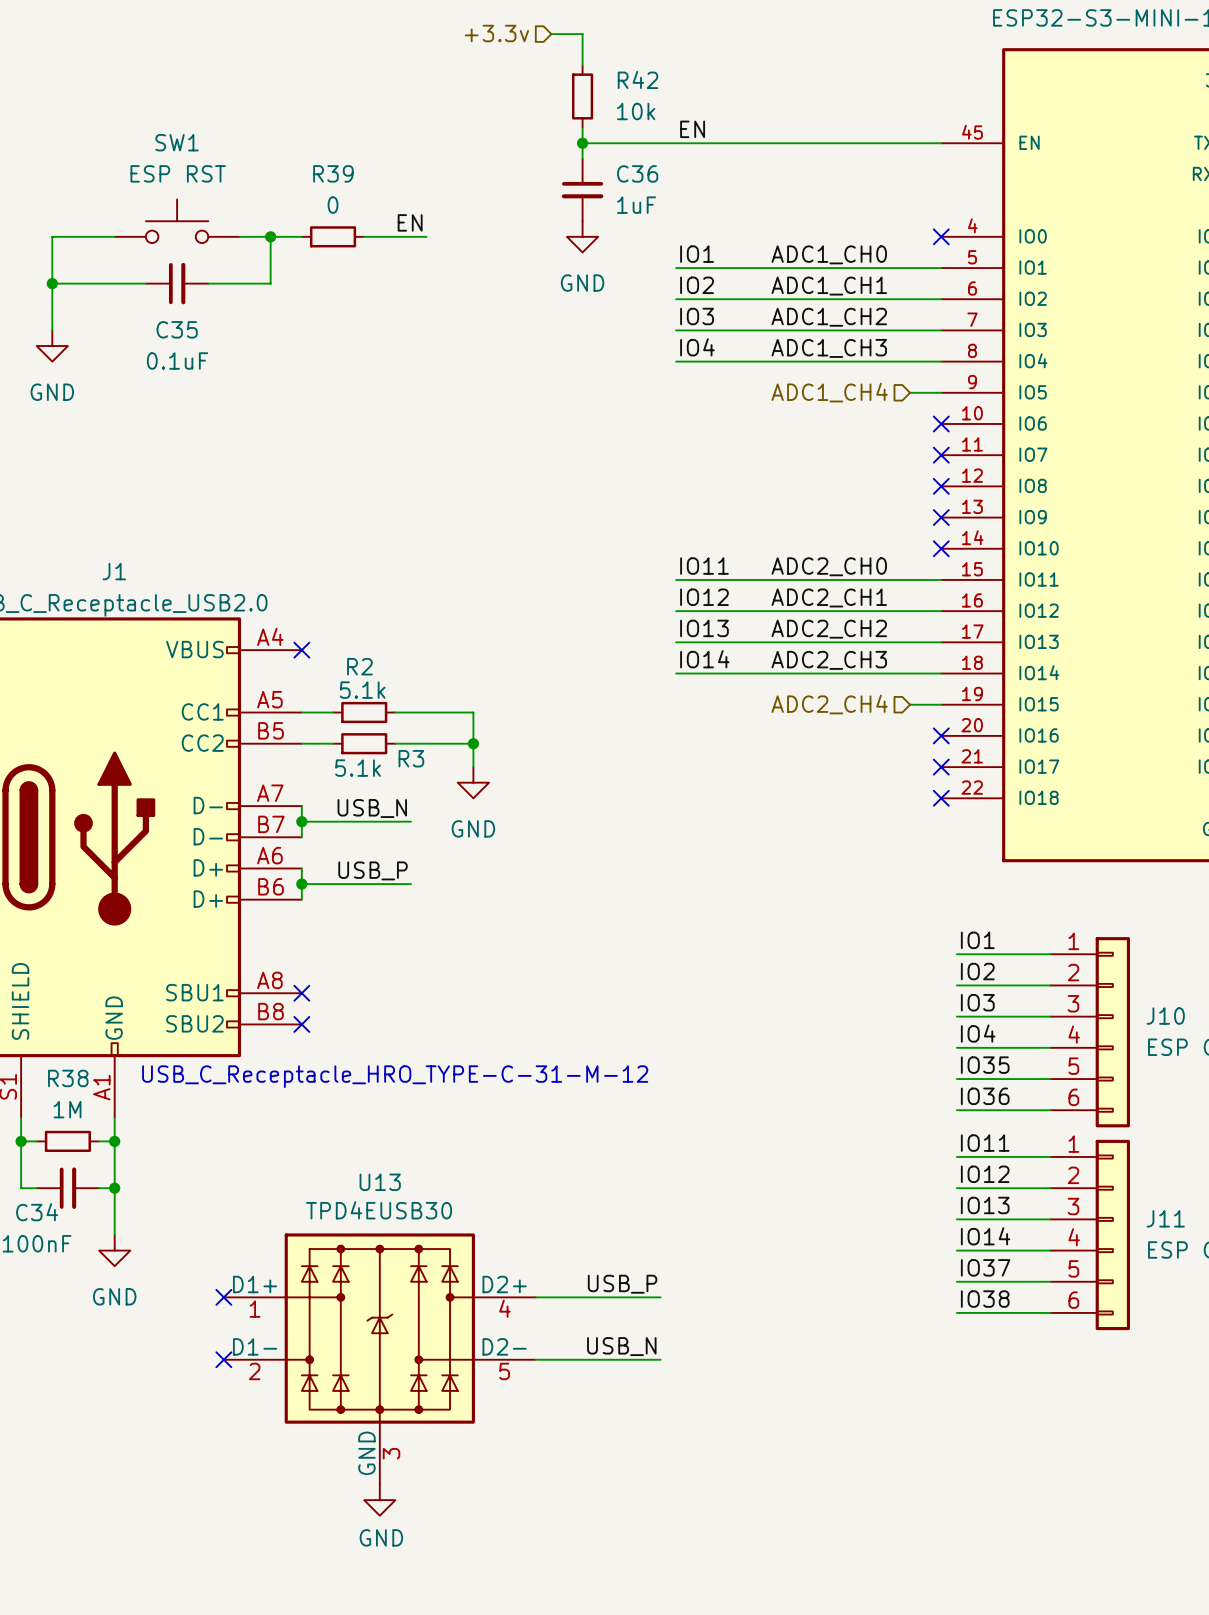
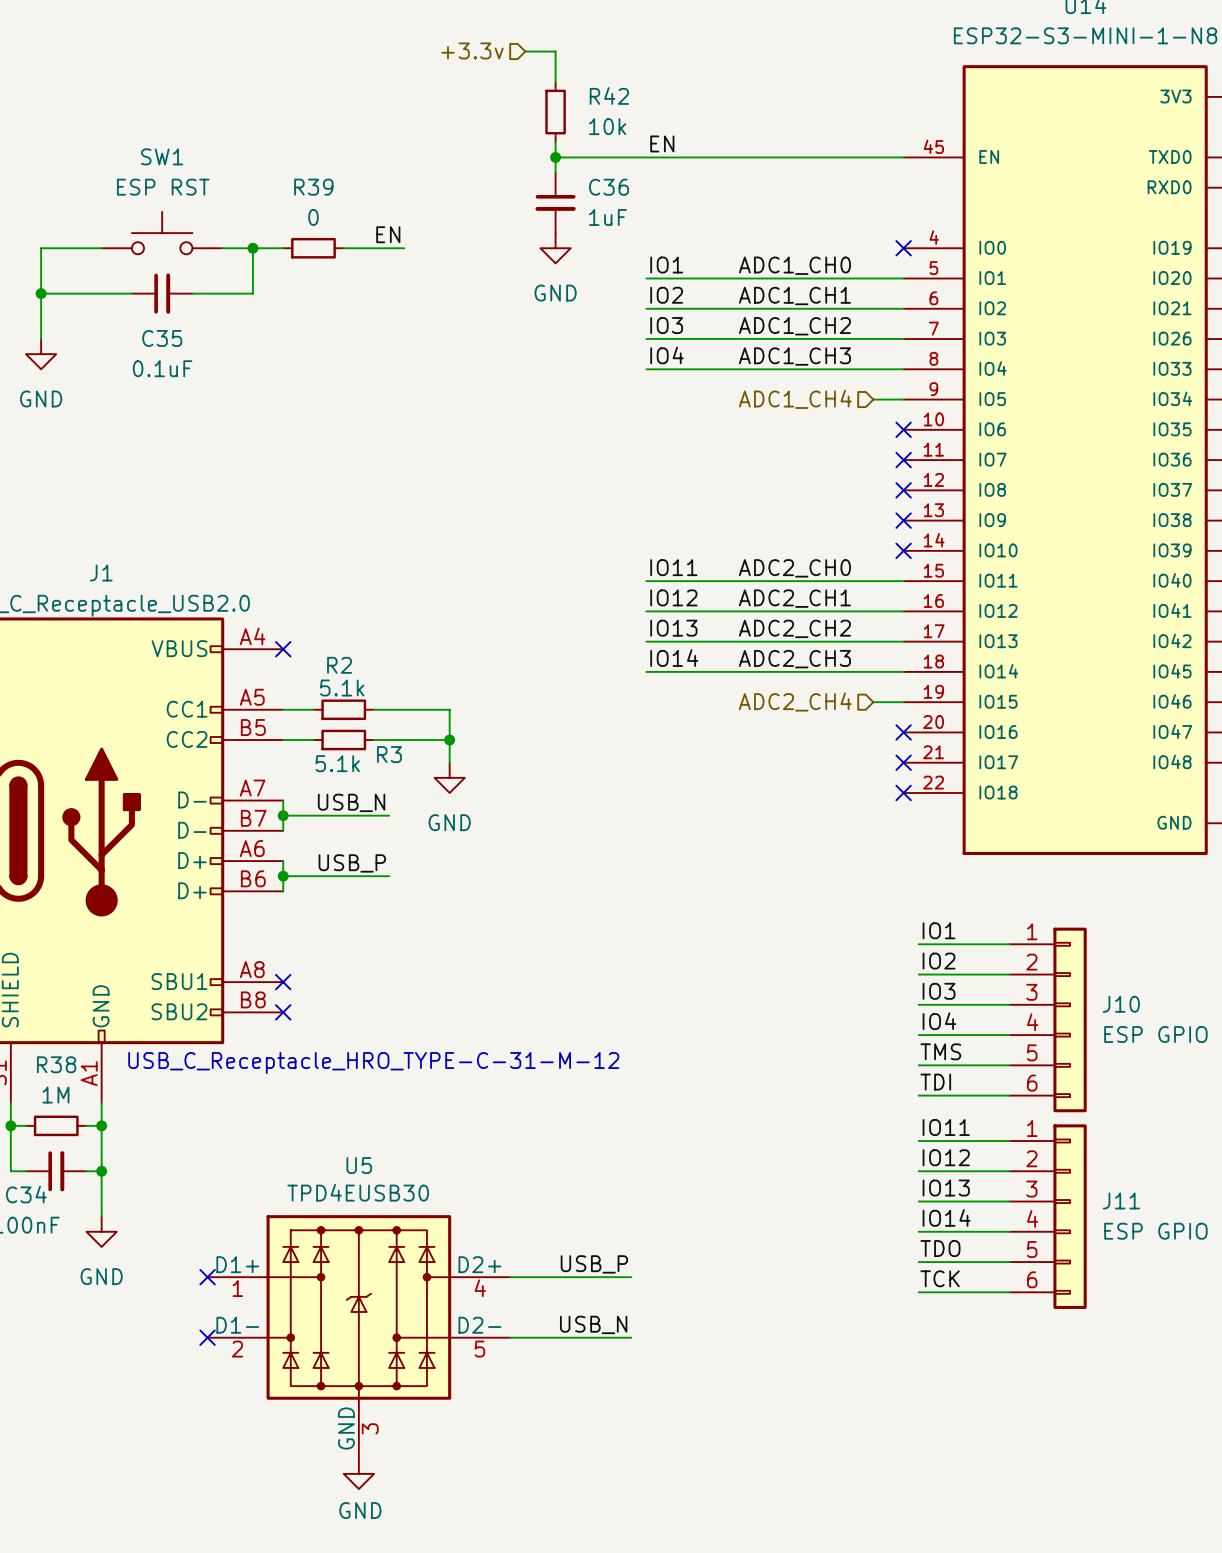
label: IO35 (985, 1065) -> TMS (940, 1051)
label: IO36 (985, 1096) -> TDI (935, 1082)
U13 name: U13 (380, 1182) -> U5 (359, 1165)
label: IO37 (985, 1267) -> TDO (940, 1248)
label: IO38 (985, 1299) -> TCK (940, 1278)

